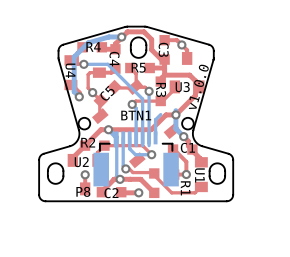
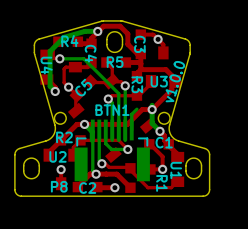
P8 footprint: [93, 131, 179, 187] -> [74, 119, 150, 182]

